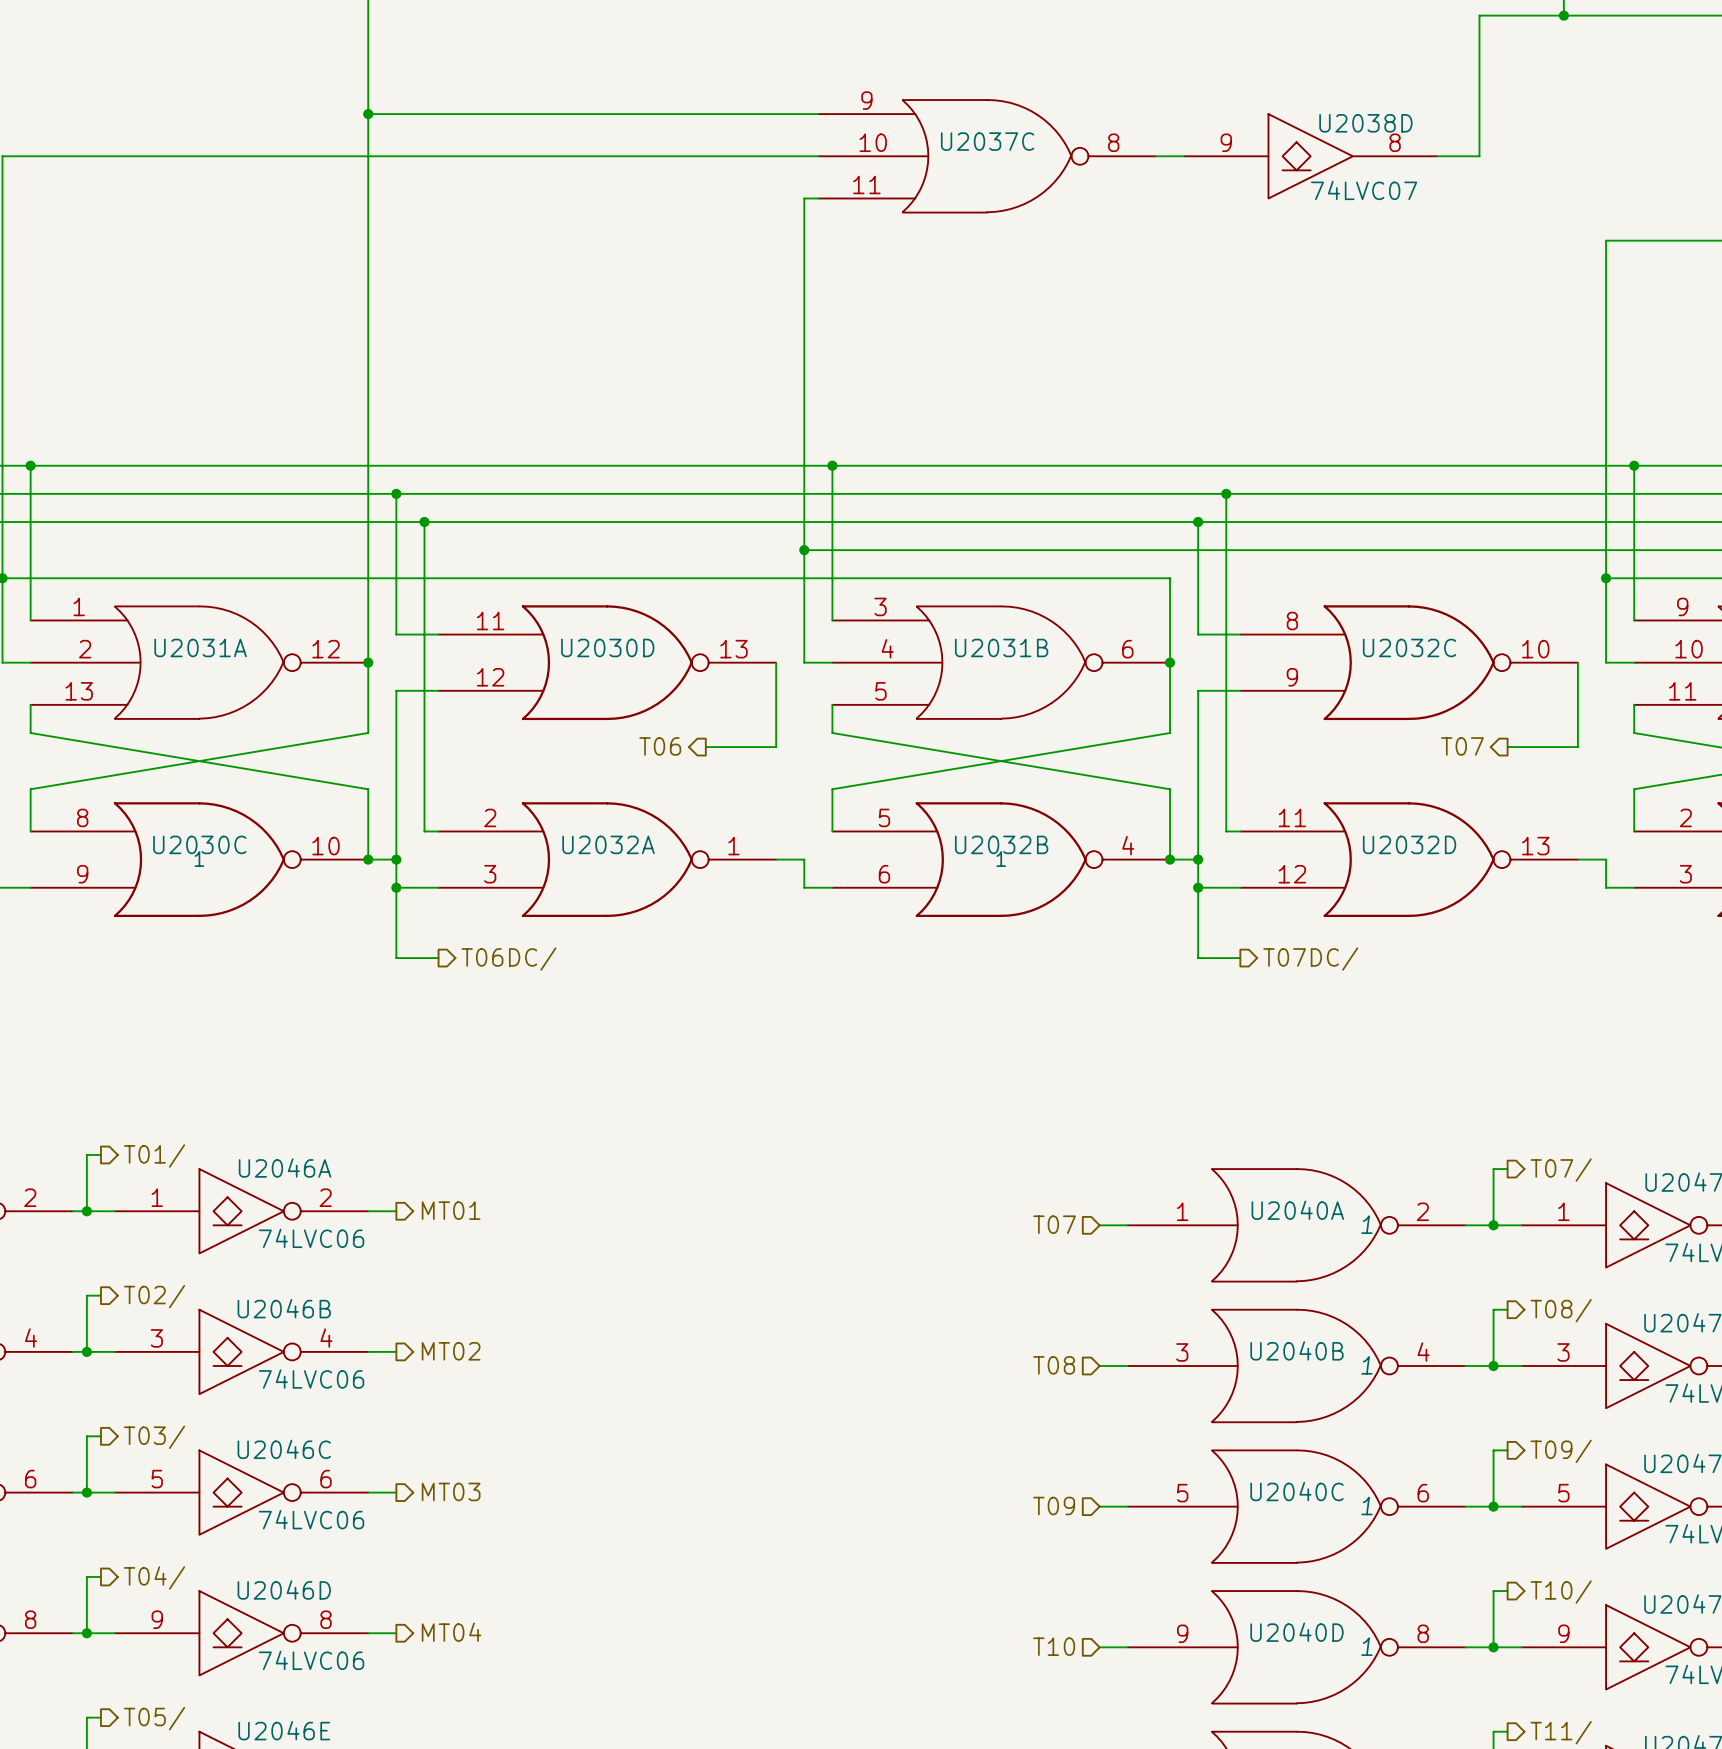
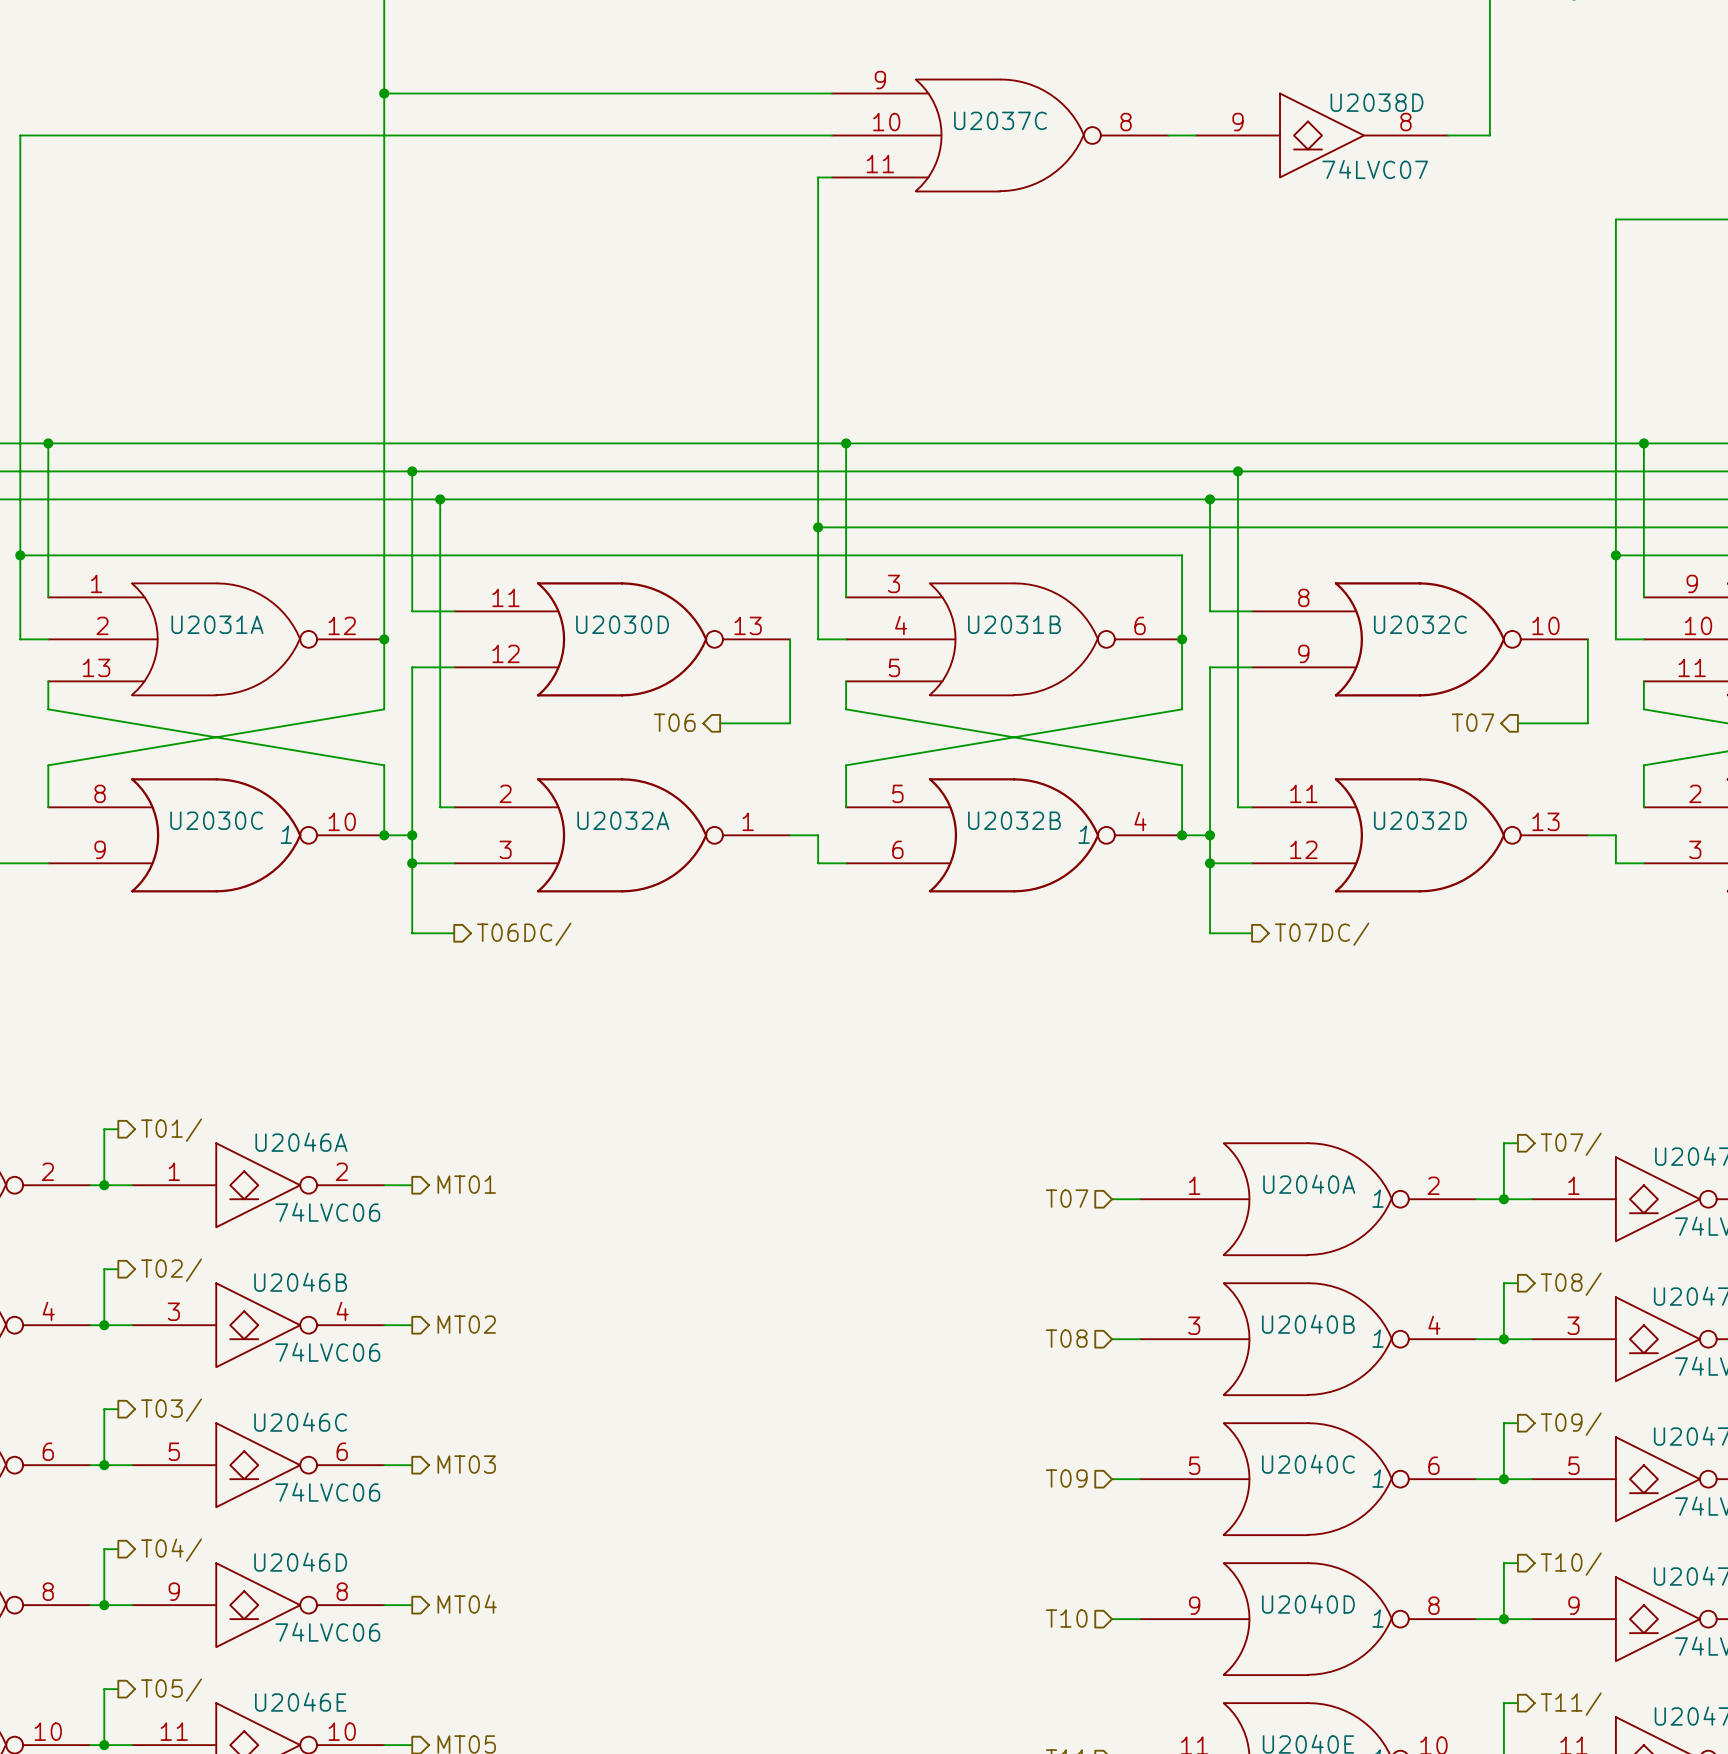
U2030C text: none -> 1 (286, 834)
U2032B text: none -> 1 (1084, 834)
U2030C text: 1 (199, 859) -> none
U2032B text: 1 (1001, 859) -> none

